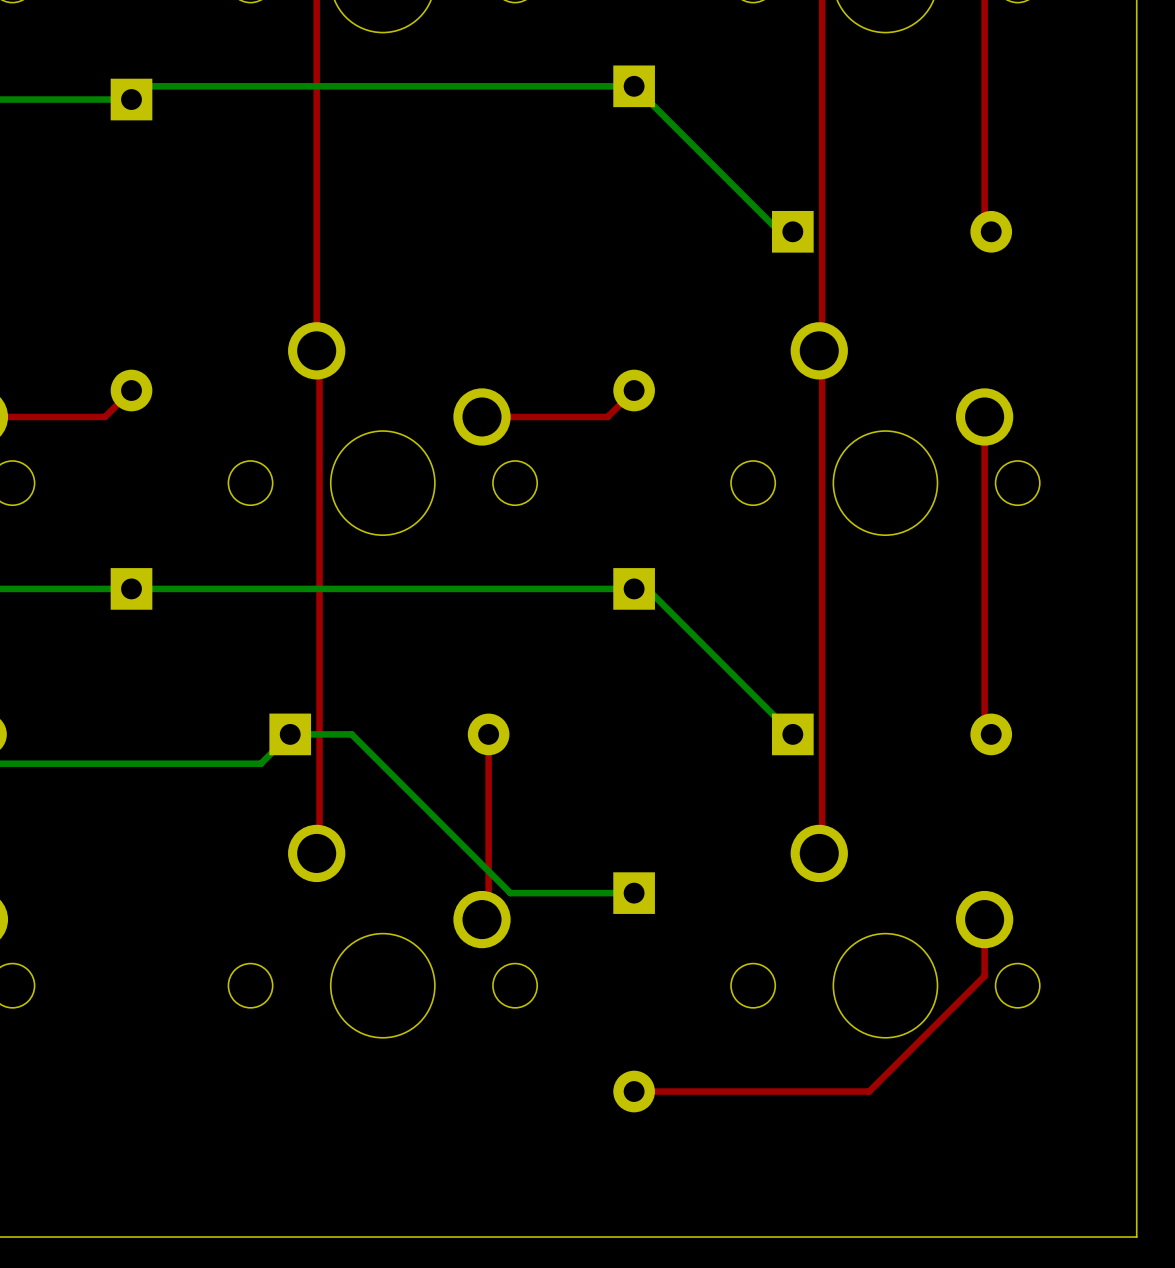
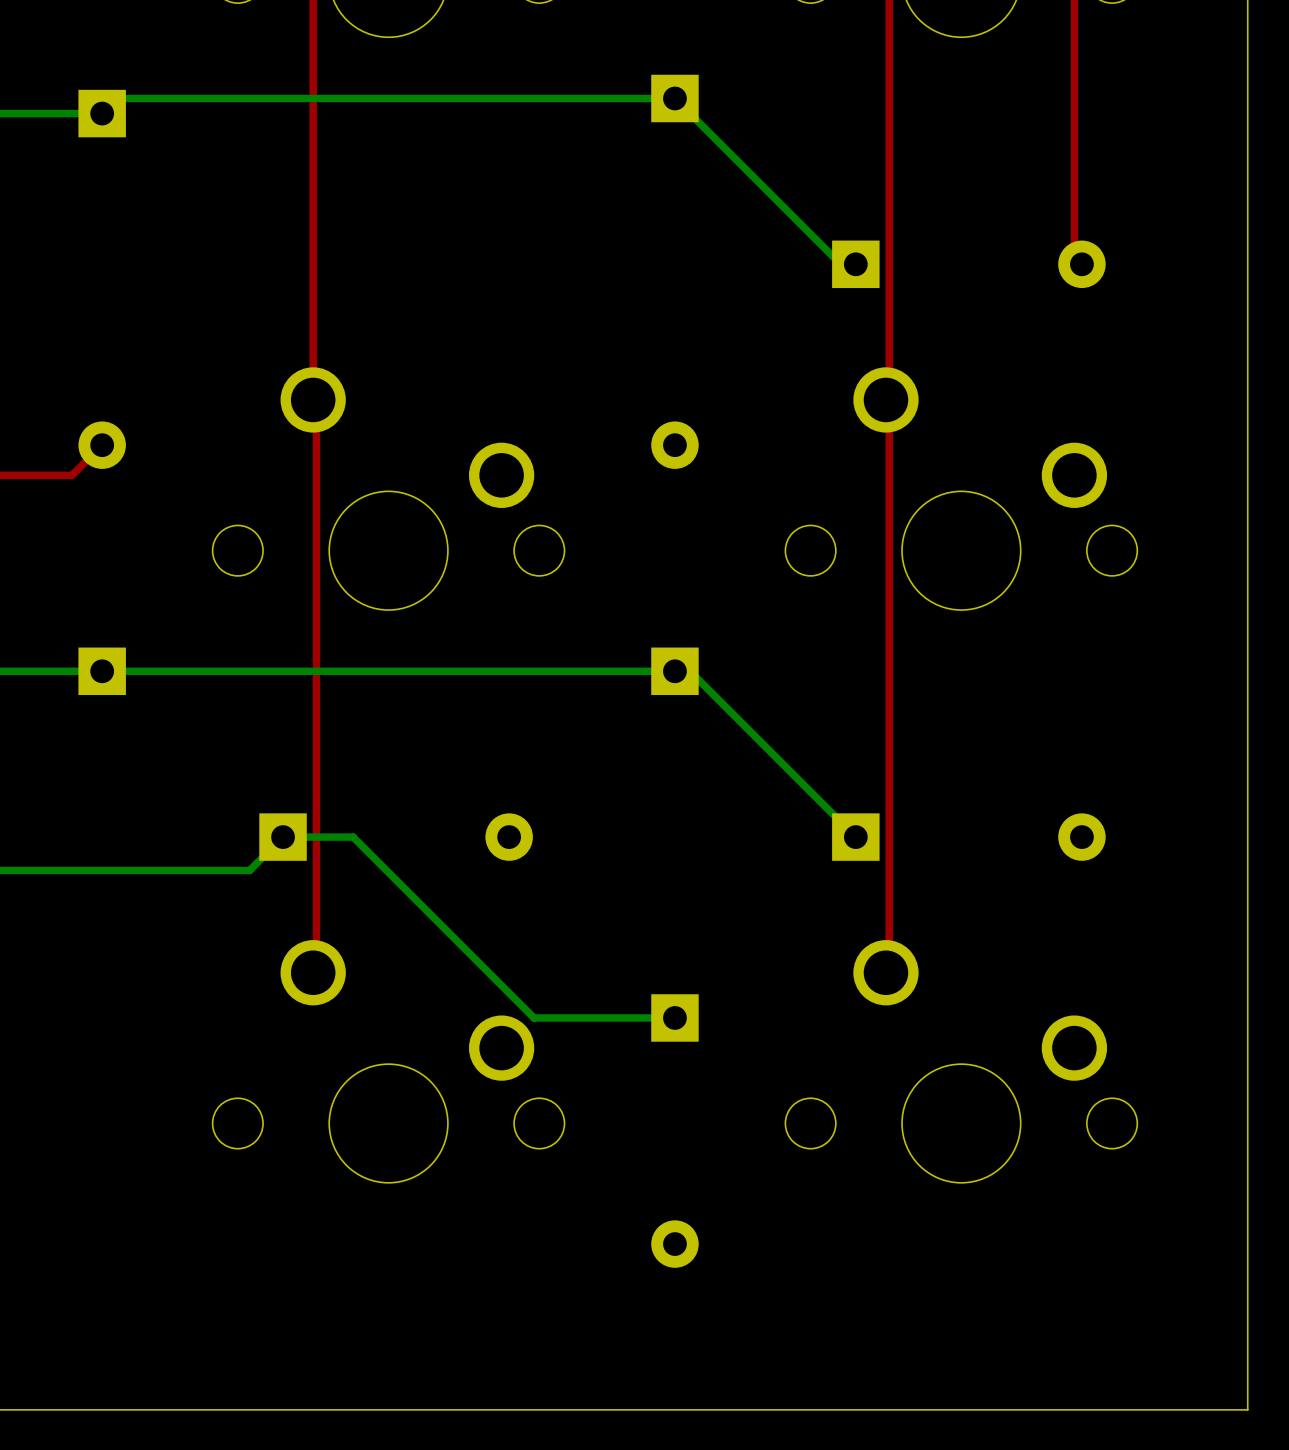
top track: (634, 390) (607, 416) (482, 416) -> none
top track: (984, 416) (984, 727) (991, 734) -> none
top track: (488, 734) (488, 912) (482, 919) -> none
top track: (984, 919) (984, 976) (869, 1091) (634, 1091) -> none

